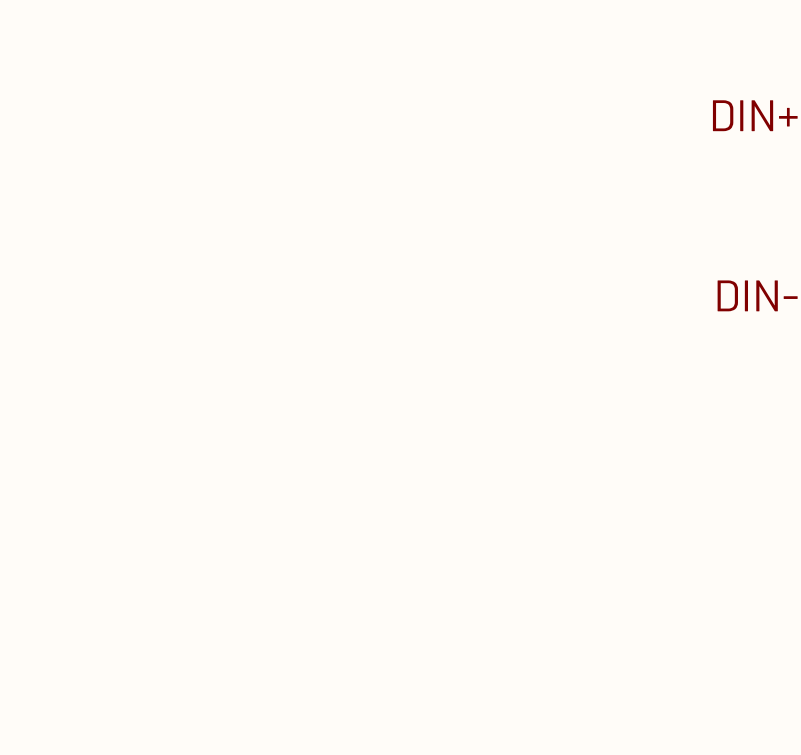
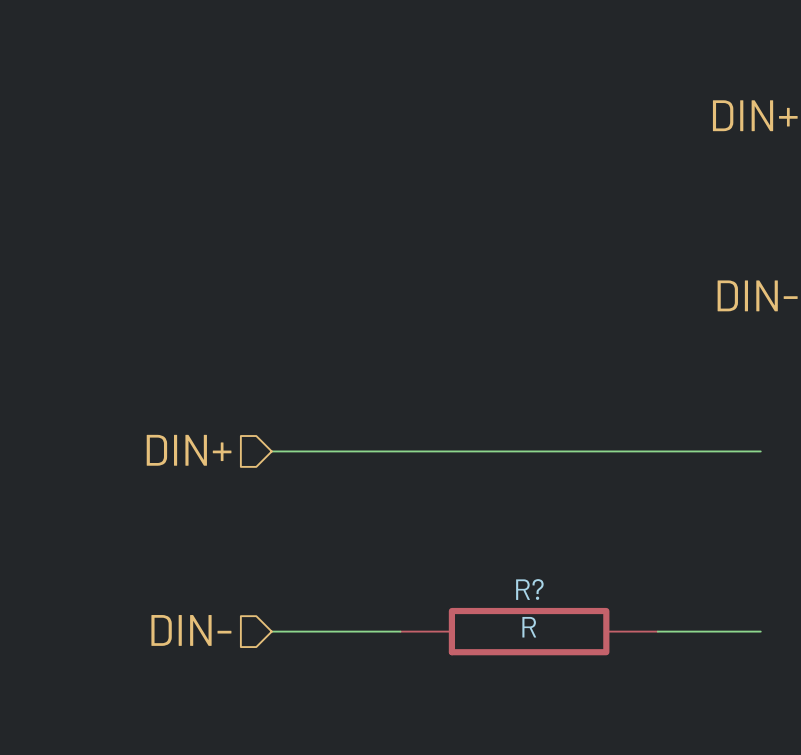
hierarchical label: none -> DIN+ (189, 450)
wire: none -> (271, 451) (760, 451)
hierarchical label: none -> DIN- (191, 630)
wire: none -> (271, 631) (400, 631)
R?: none -> R (529, 631)
wire: none -> (657, 631) (760, 631)

